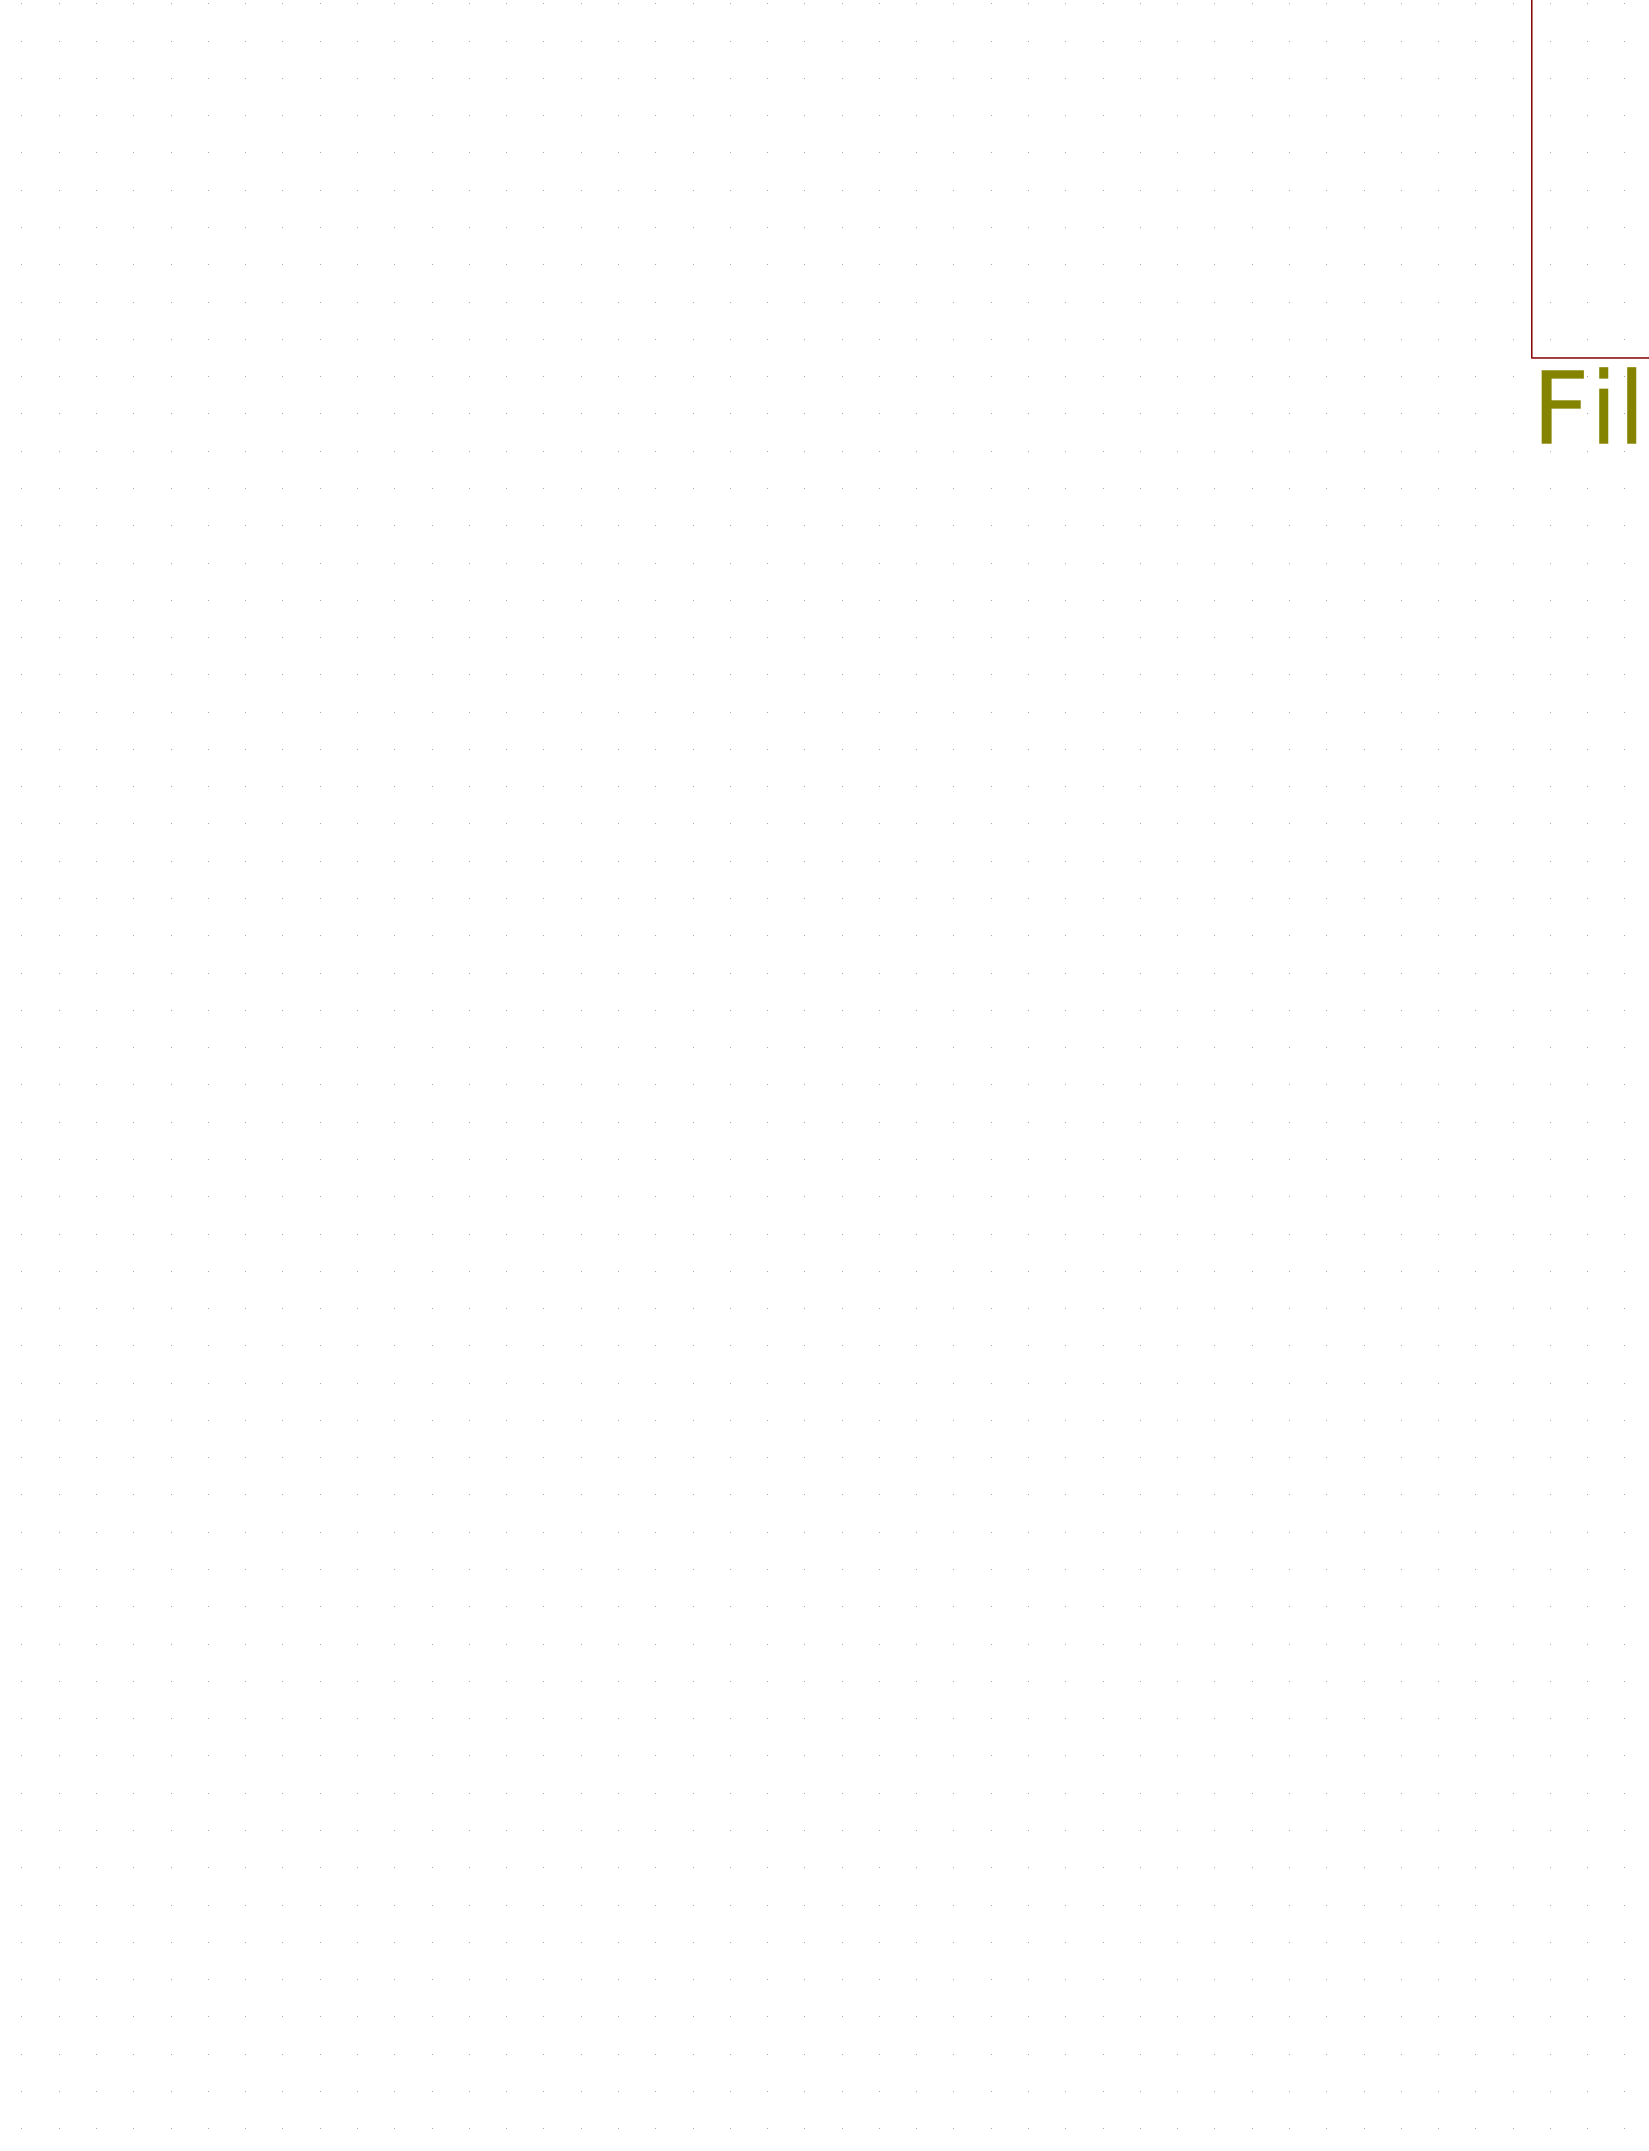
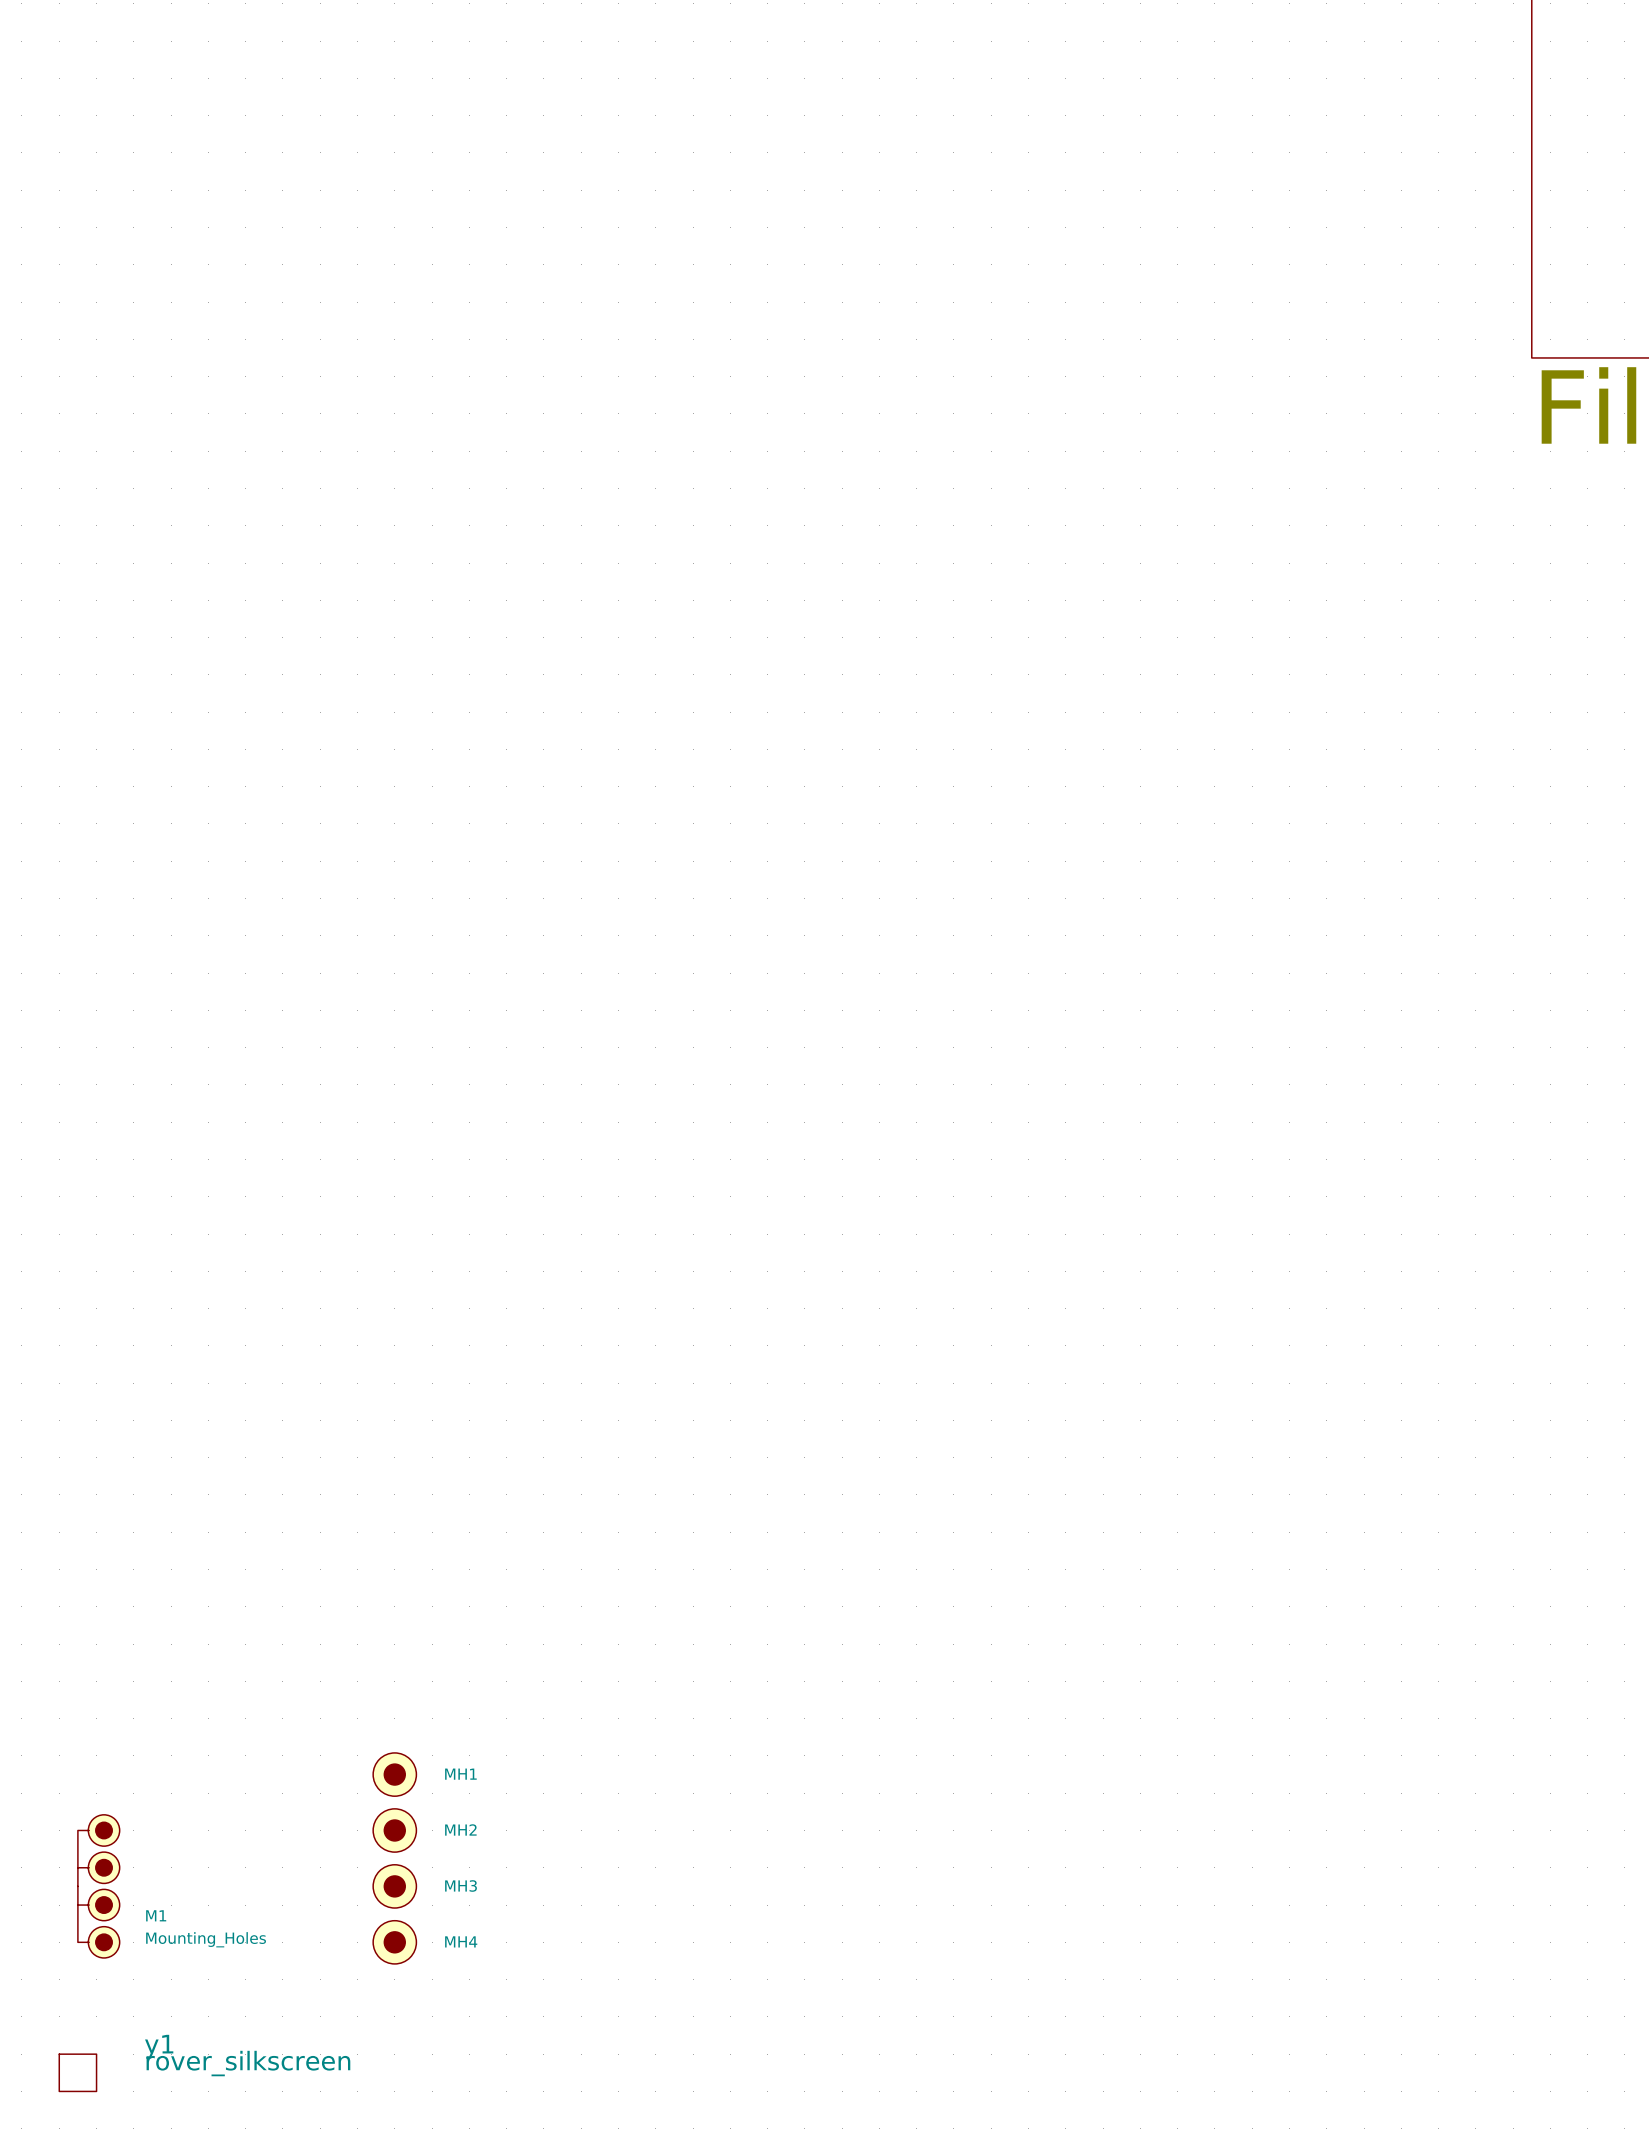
MH1: none -> (394, 1774)
MH2: none -> (394, 1830)
M1: none -> Mounting_Holes (98, 1886)
MH3: none -> (394, 1886)
MH4: none -> (394, 1942)
y1: none -> rover_silkscreen (77, 2072)

